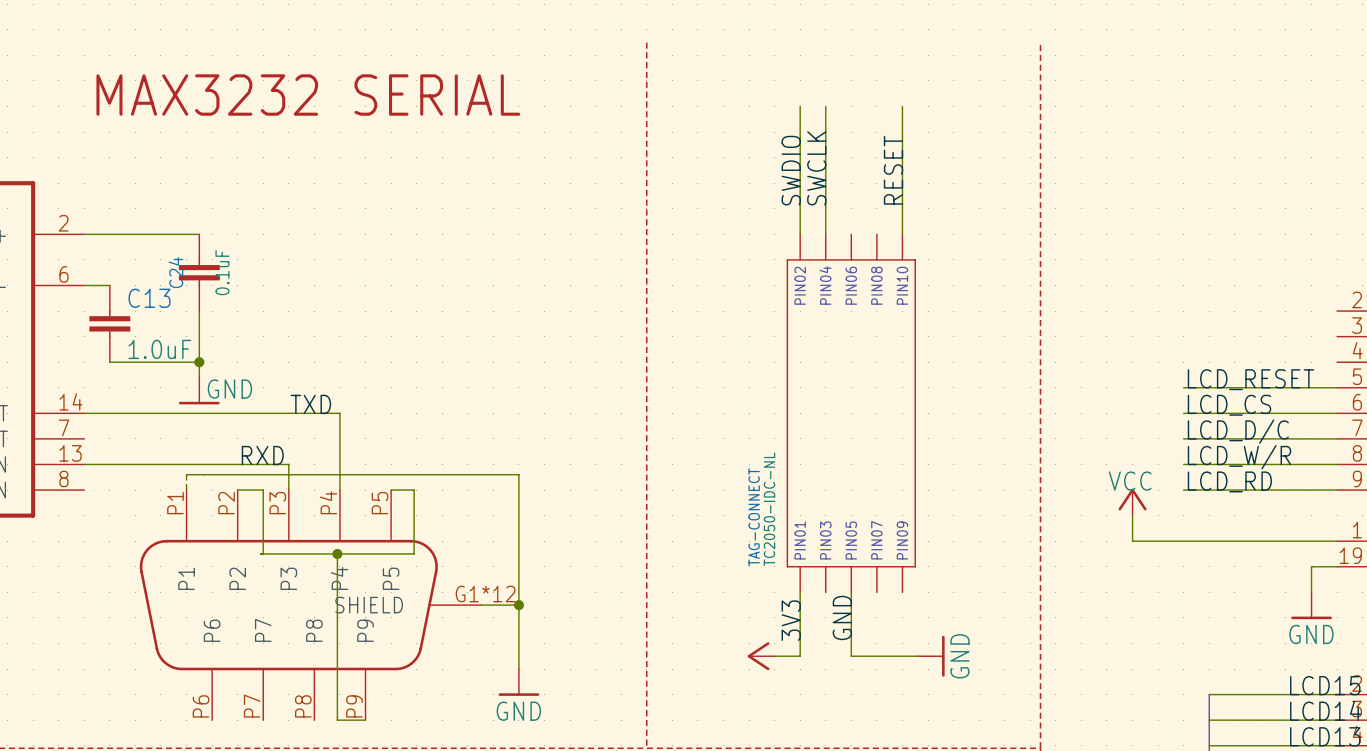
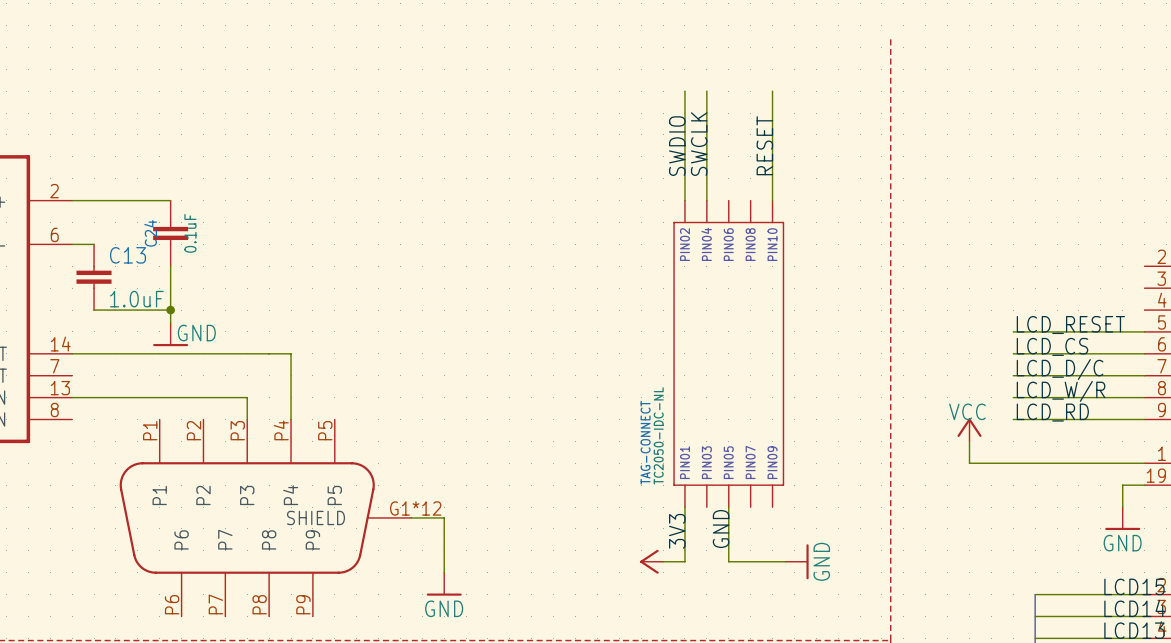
line: (646, 42) (646, 745) -> none
text: MAX3232 SERIAL (308, 95) -> none
label: TXD (310, 404) -> none
label: RXD (262, 455) -> none
wire: (186, 490) (186, 474) (518, 474) (518, 605) -> none
wire: (237, 490) (263, 490) (263, 553) -> none
wire: (391, 490) (414, 490) (414, 553) (260, 553) -> none
wire: (337, 553) (337, 720) (365, 720) -> none
junction: (337, 553) -> none
junction: (518, 605) -> none

